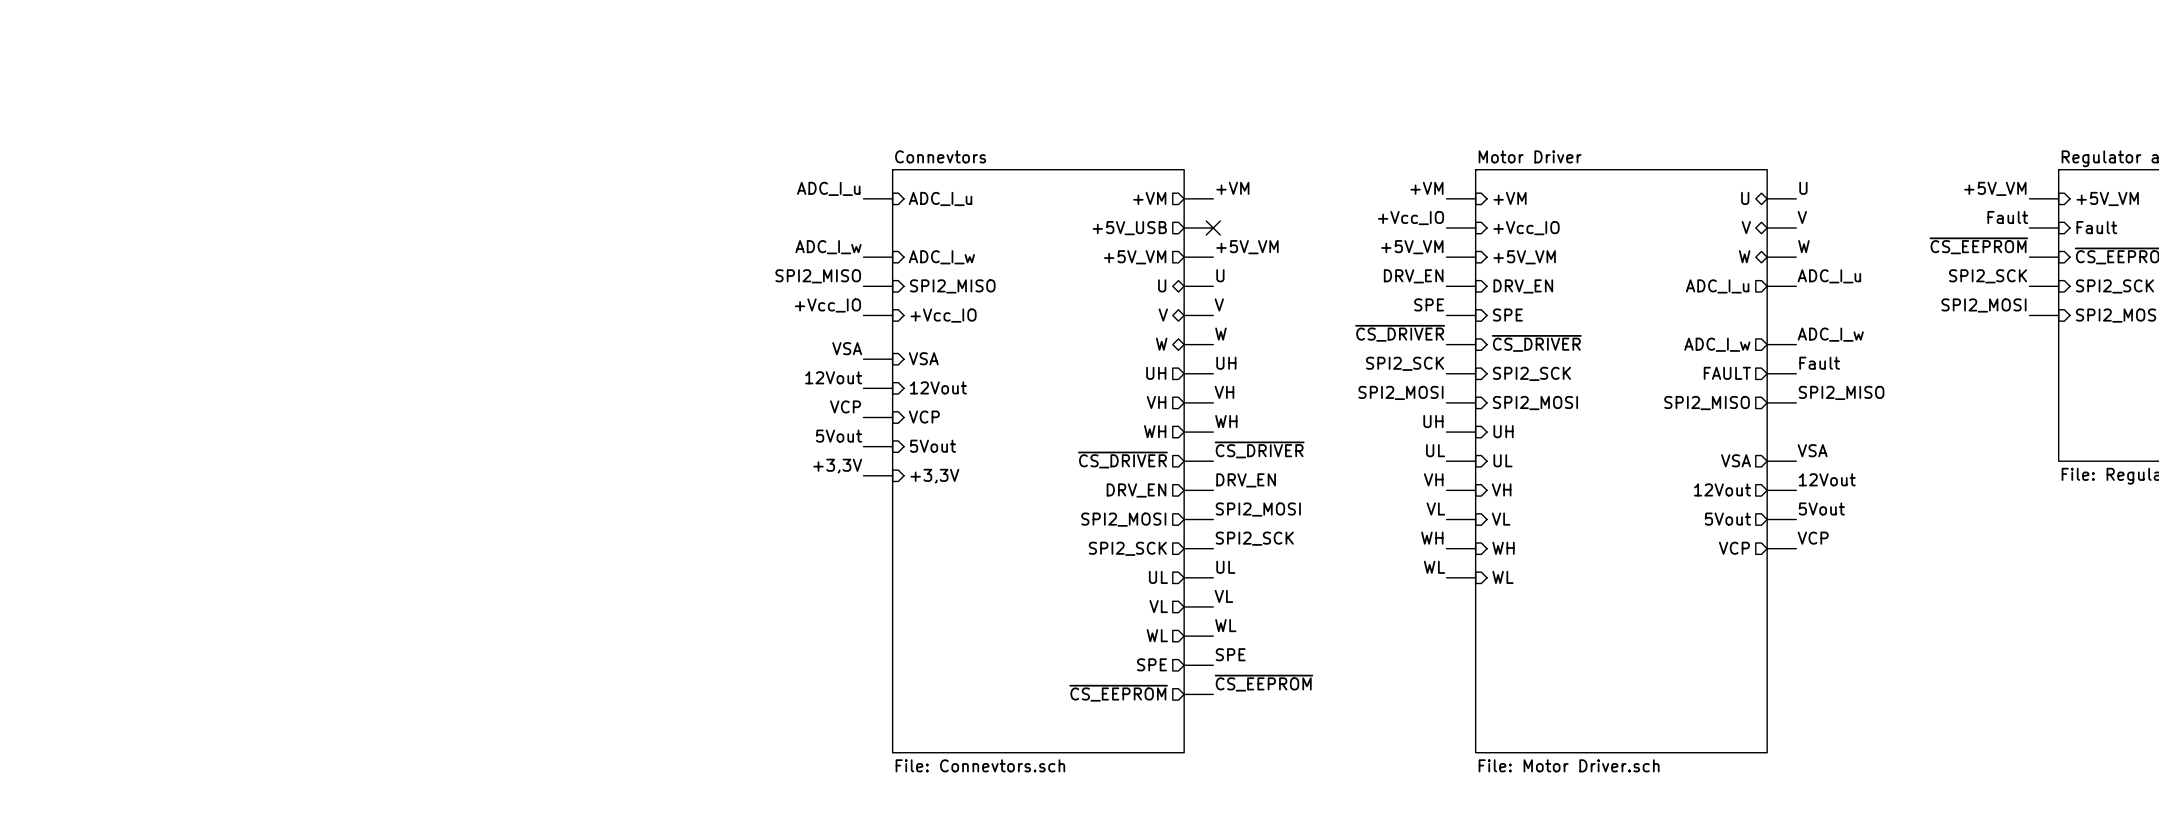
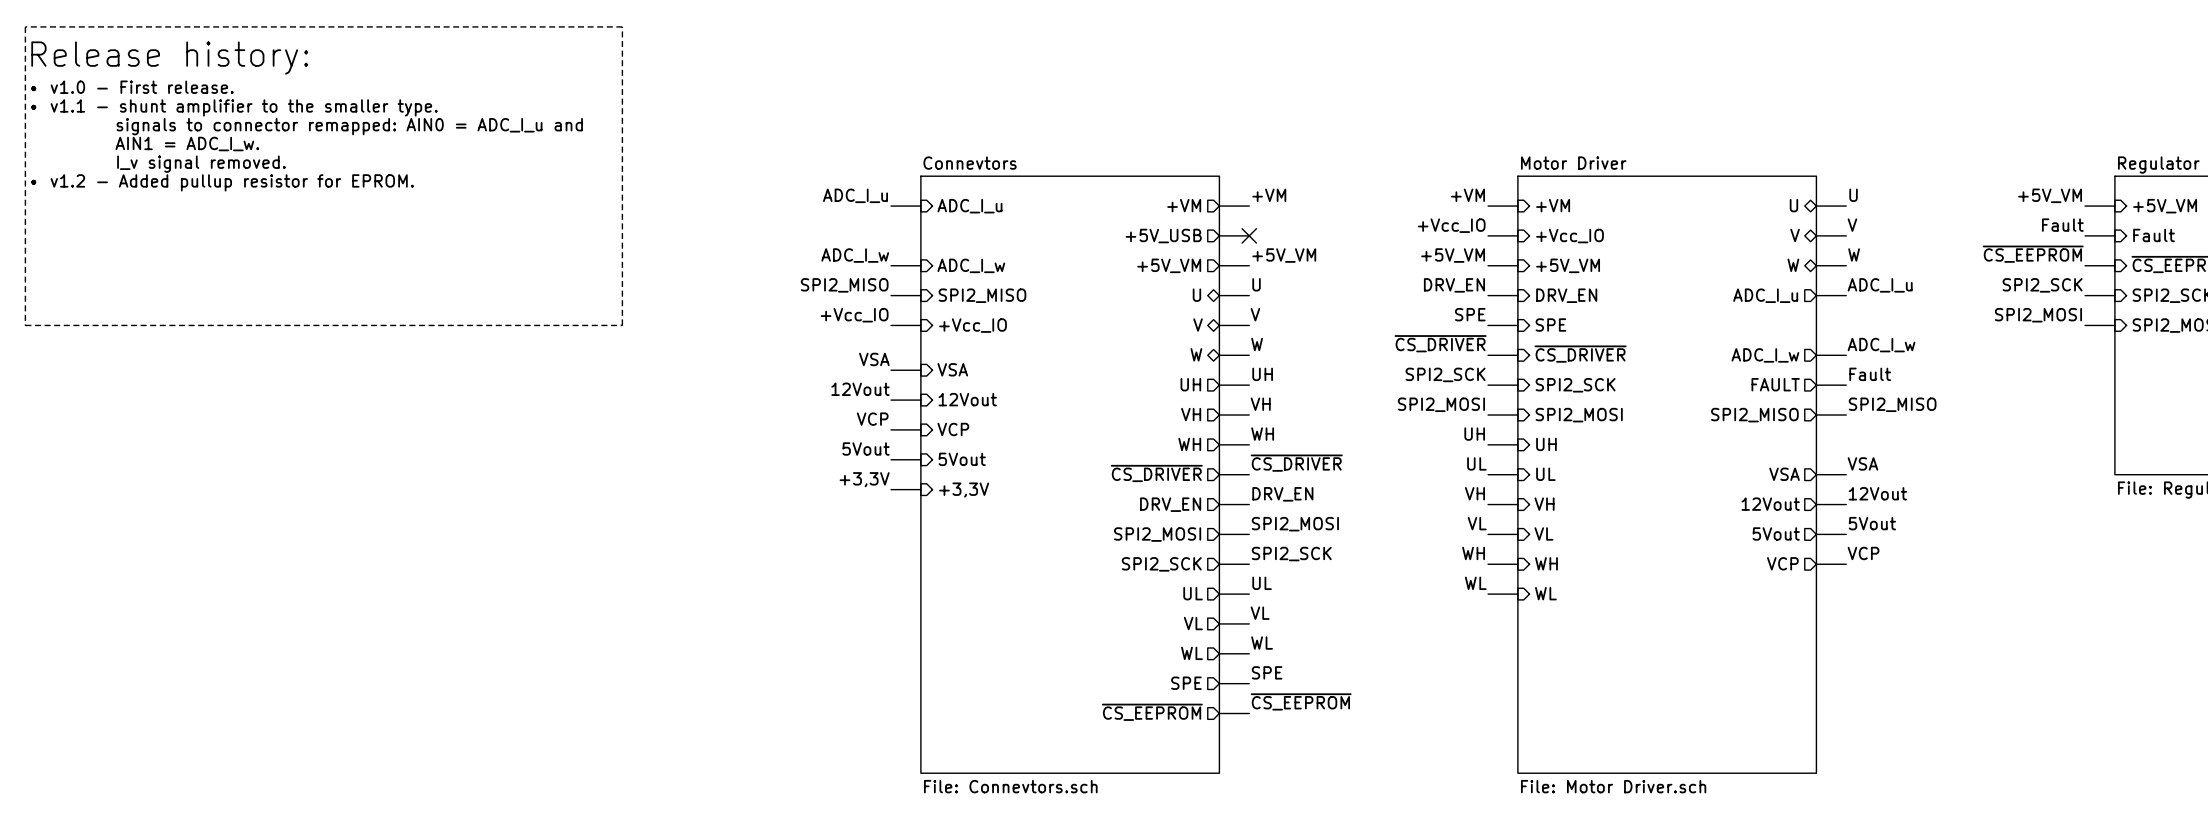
line: none -> (25, 26) (25, 325) (622, 325) (622, 26) (25, 26)
text: none -> Release history: (169, 58)
text: none -> • v1.0 - First release. (132, 87)
text: none -> • v1.1 - shunt amplifier to the smaller type. (234, 107)
text: none -> signals to connector remapped: AIN0 = ADC_I_u and (349, 126)
text: none -> AIN1 = ADC_I_w. (187, 144)
text: none -> I_v signal removed. (201, 164)
text: none -> • v1.2 - Added pullup resistor for EPROM. (222, 182)

